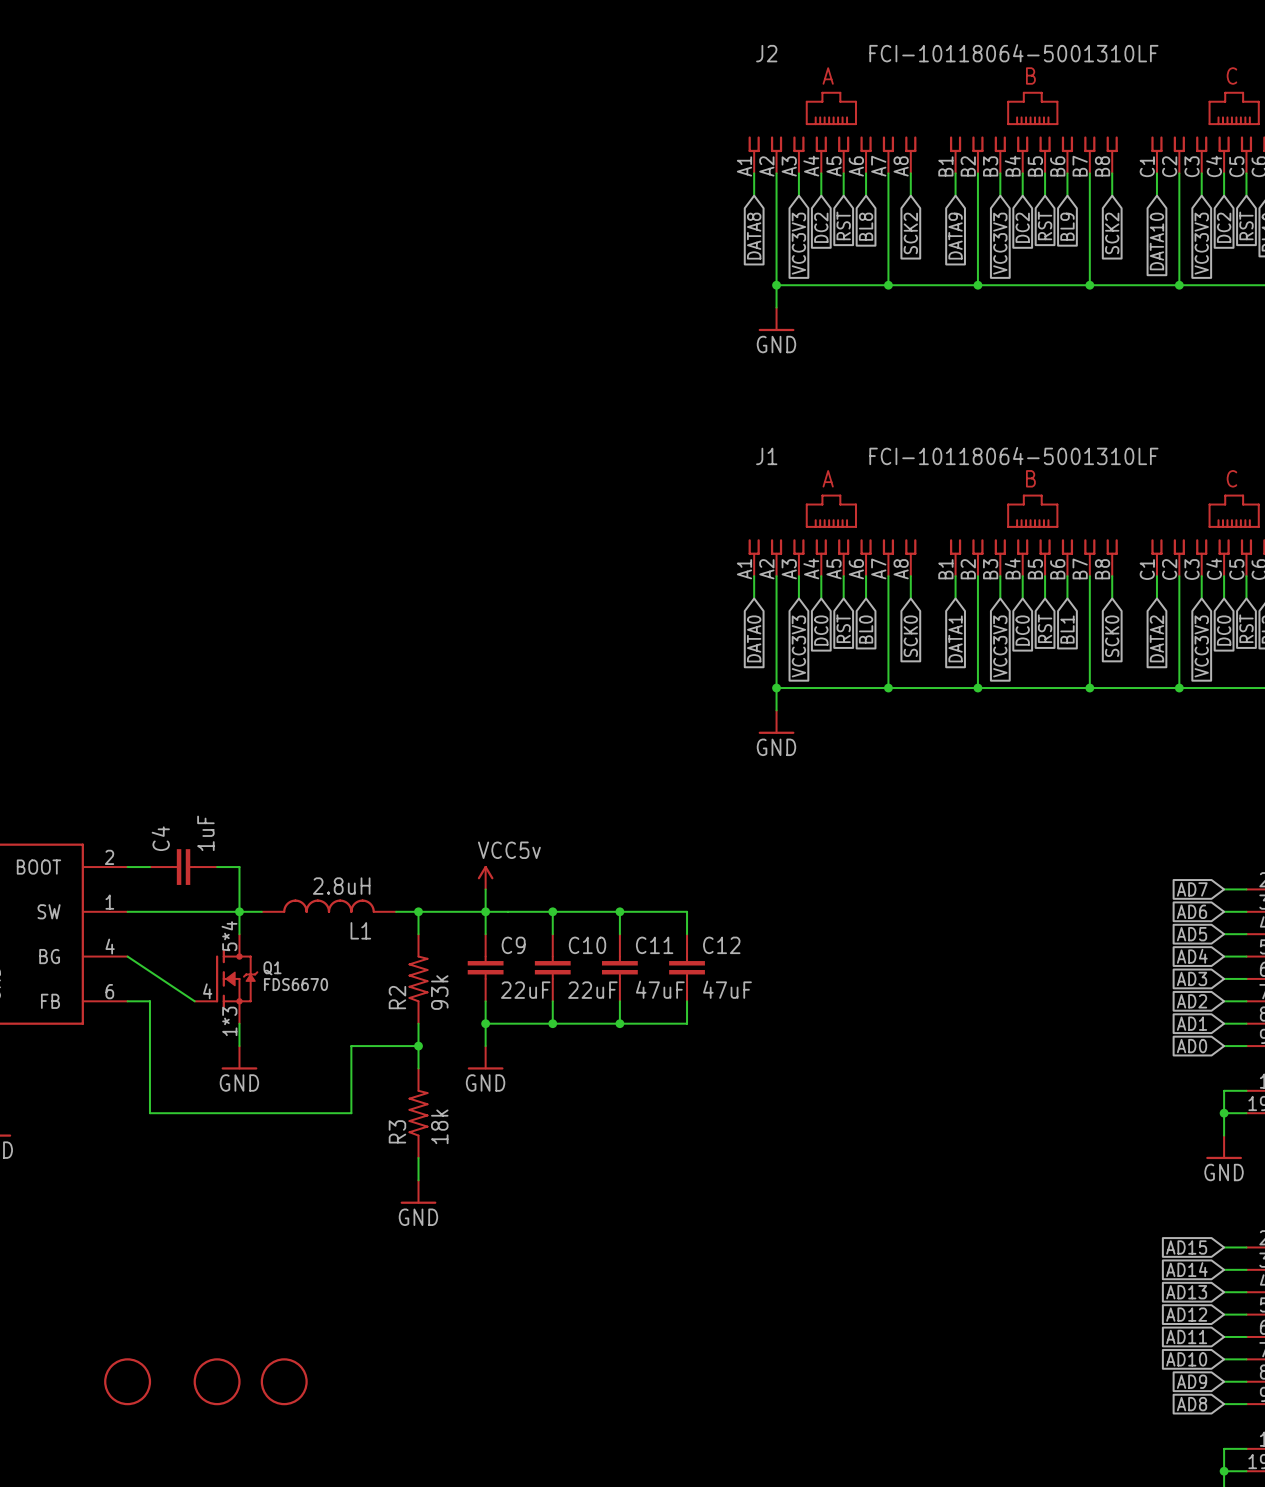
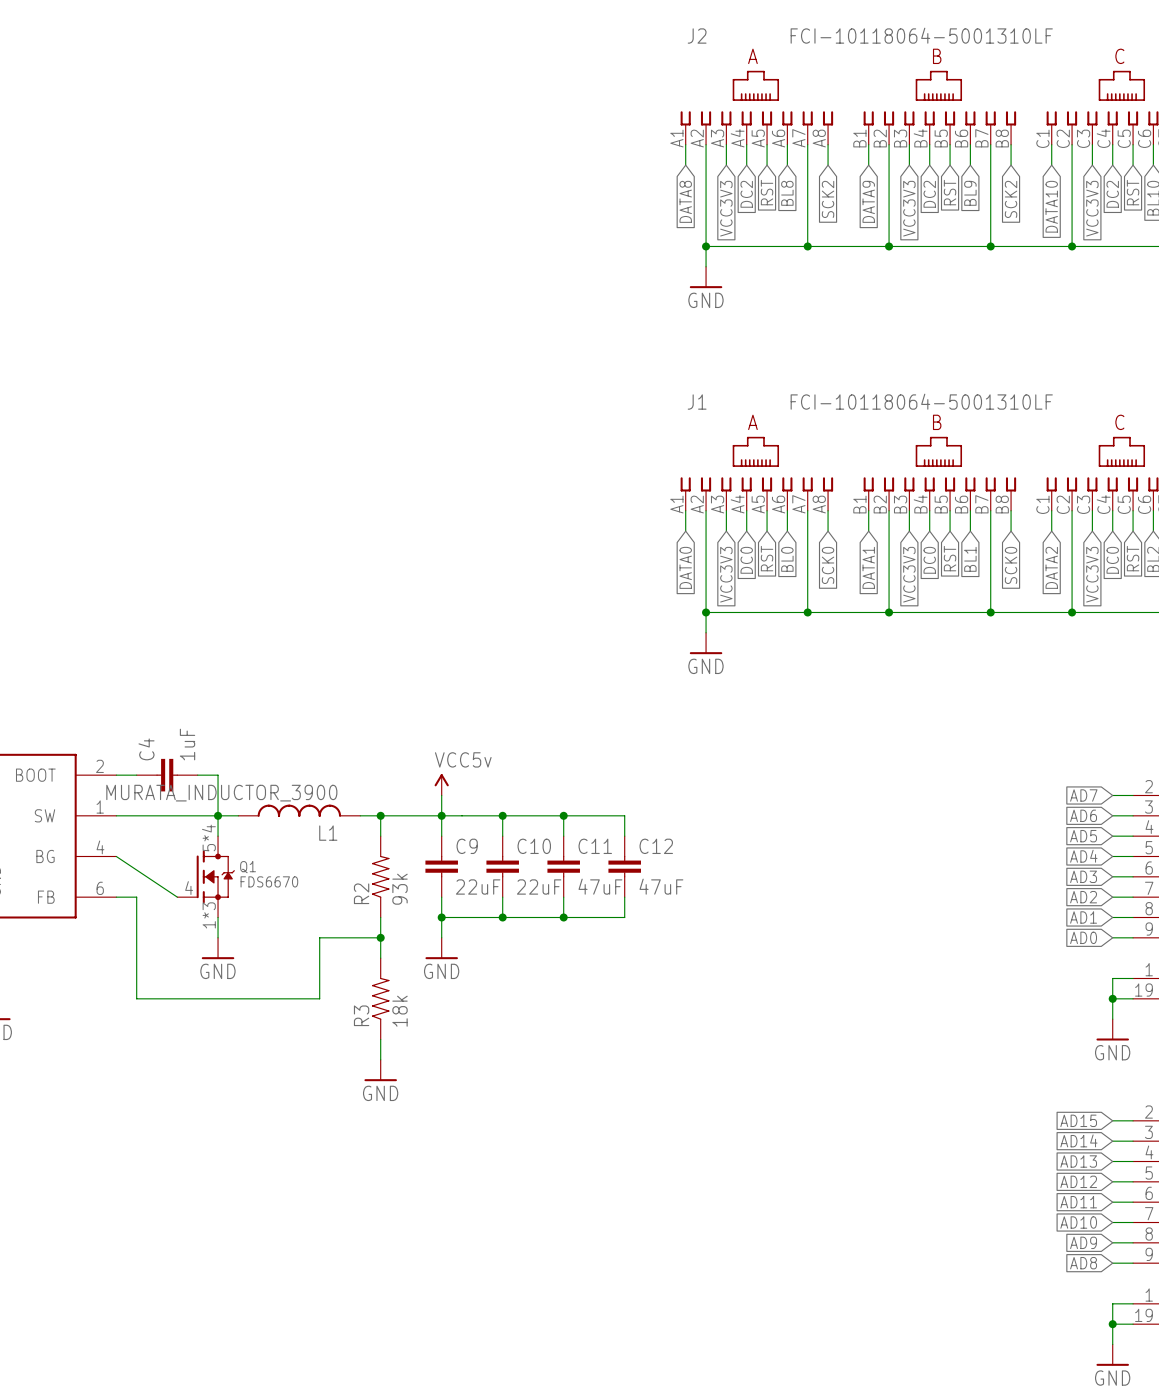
L1 value: 2.8uH (341, 886) -> MURATA_INDUCTOR_3900 (221, 793)
part: (127, 1381) -> none
part: (217, 1381) -> none
part: (284, 1381) -> none

